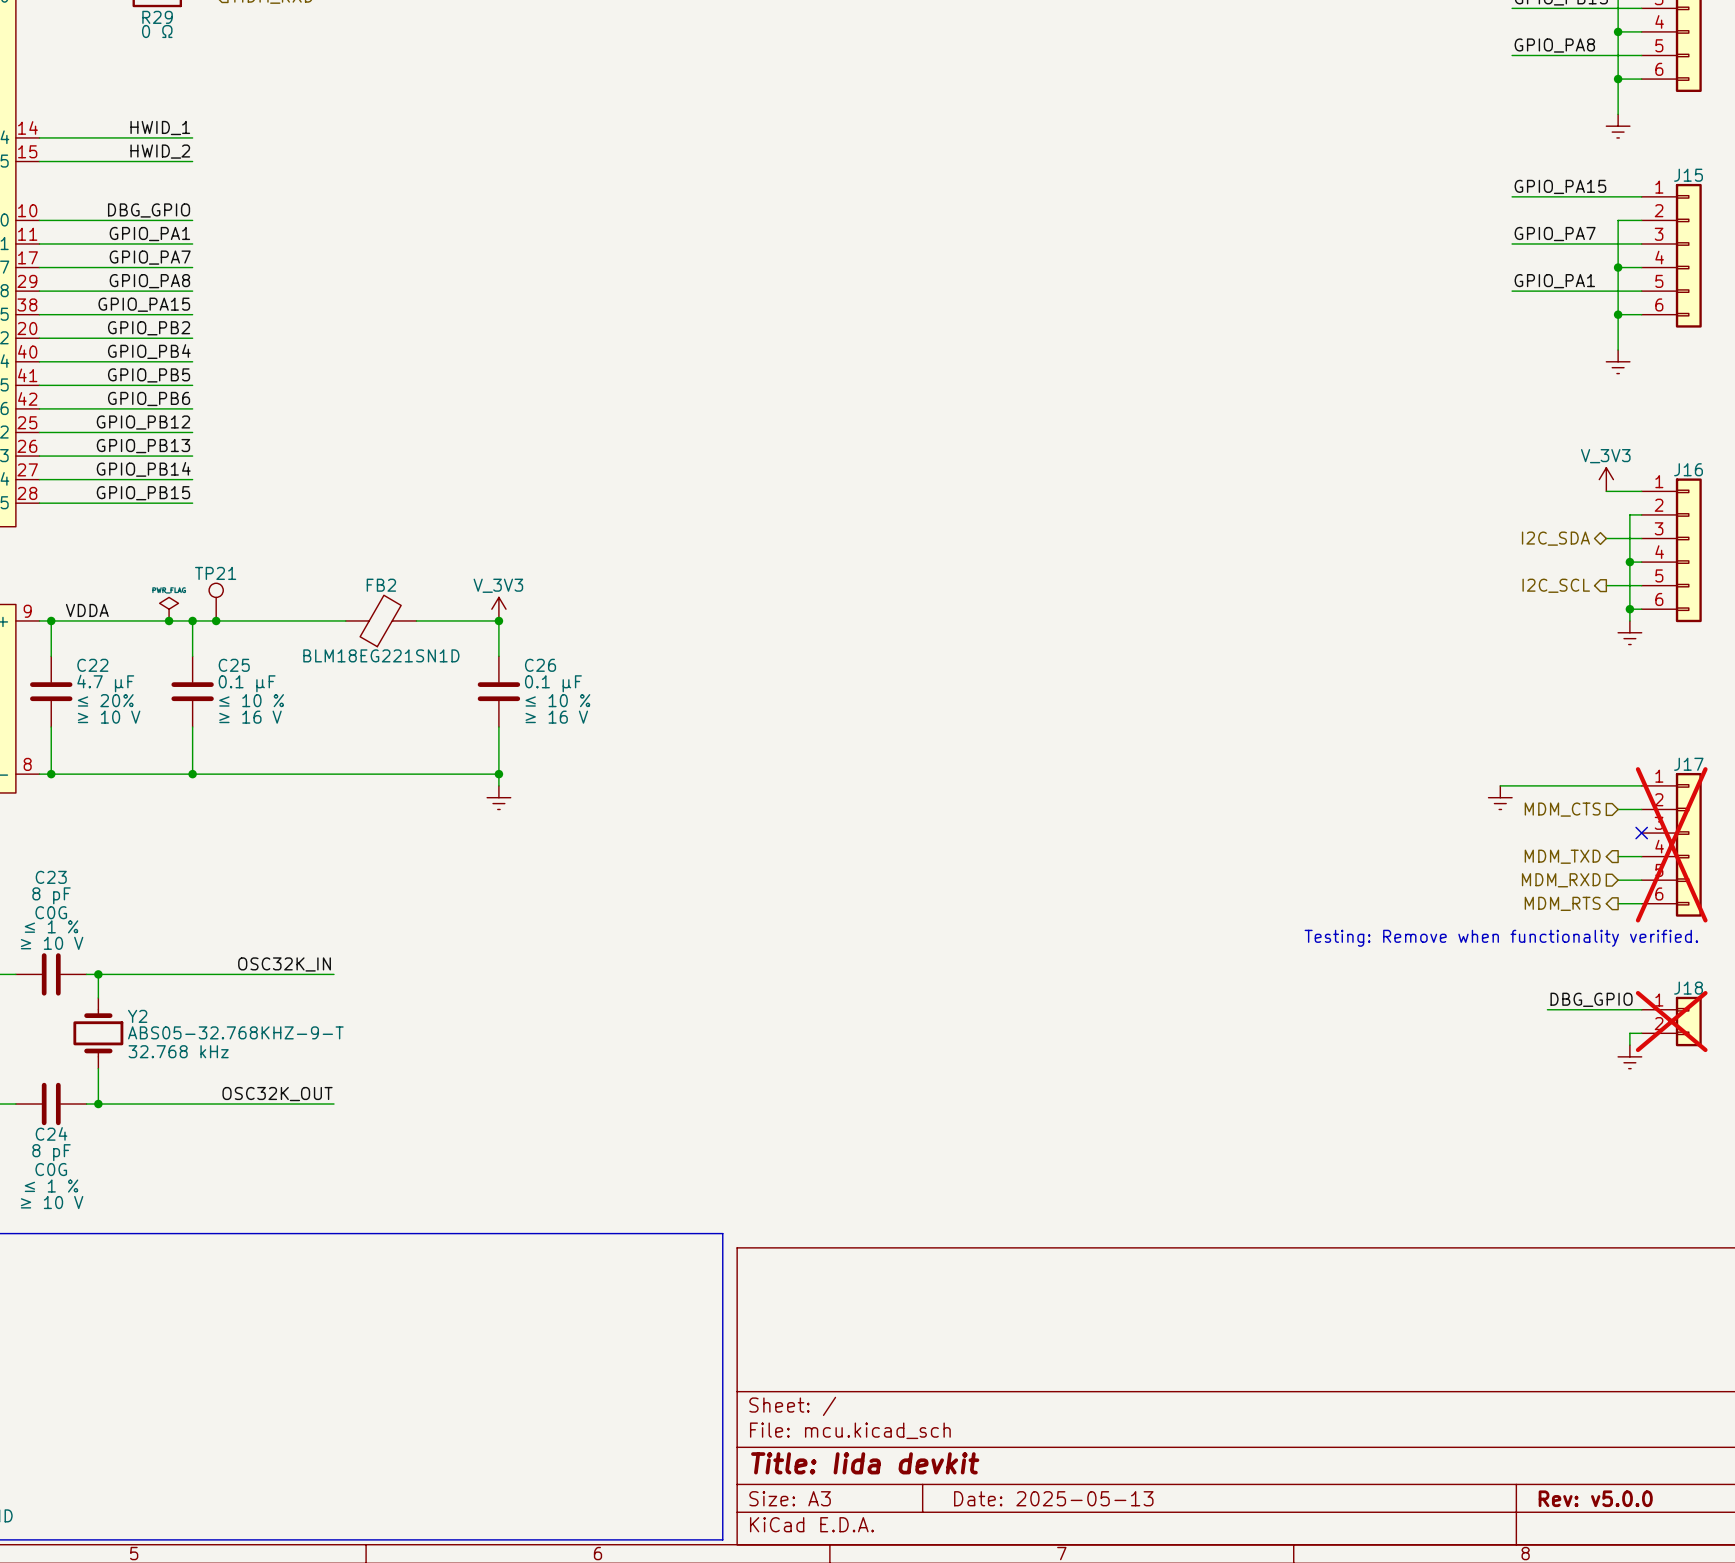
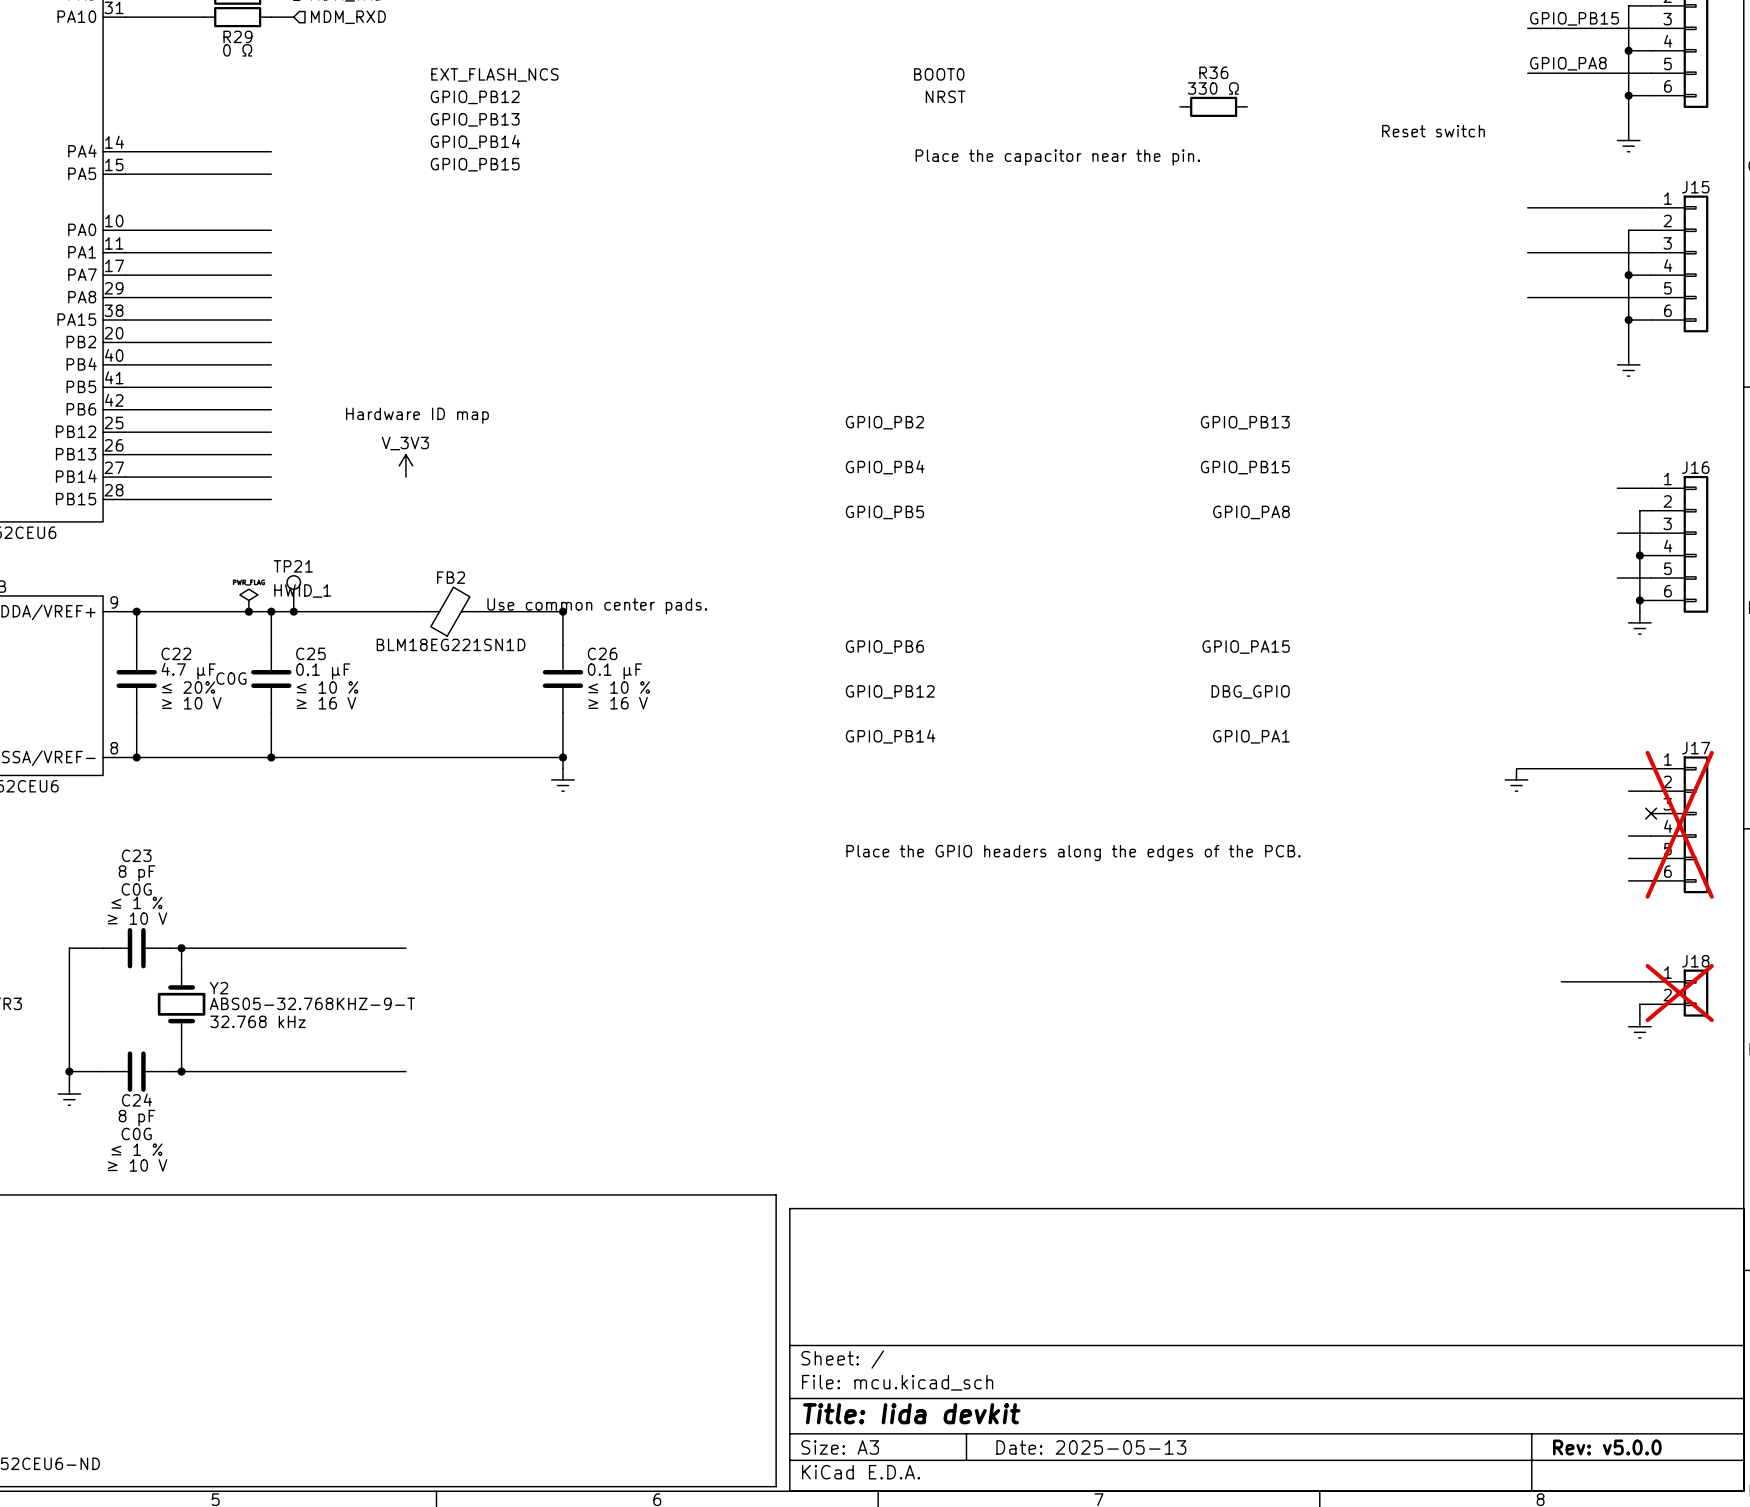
label: none -> BOOT0 (939, 74)
label: none -> EXT_FLASH_NCS (494, 74)
label: none -> GPIO_PB12 (475, 97)
label: none -> NRST (945, 96)
R36: none -> 330 Ω (1213, 106)
label: none -> GPIO_PB13 (475, 119)
text: none -> Reset switch (1433, 131)
label: none -> GPIO_PB14 (475, 142)
label: HWID_1 (160, 128) -> none
text: none -> Place the capacitor near the pin. (1057, 157)
label: HWID_2 (160, 151) -> none
label: none -> GPIO_PB15 (475, 164)
label: GPIO_PA15 (1560, 186) -> none
label: DBG_GPIO (149, 210) -> none
label: GPIO_PA1 (149, 234) -> none
label: GPIO_PA7 (1555, 234) -> none
label: GPIO_PA7 (150, 257) -> none
label: GPIO_PA8 (149, 281) -> none
label: GPIO_PA1 (1554, 281) -> none
label: GPIO_PA15 (144, 304) -> none
label: GPIO_PB2 (149, 328) -> none
label: GPIO_PB4 (149, 351) -> none
label: GPIO_PB5 (149, 375) -> none
label: GPIO_PB6 (149, 398) -> none
text: none -> Hardware ID map (417, 415)
label: GPIO_PB12 (143, 422) -> none
label: none -> GPIO_PB2 (884, 422)
label: none -> GPIO_PB13 (1245, 422)
label: GPIO_PB13 (143, 446) -> none
label: GPIO_PB14 (143, 469) -> none
label: none -> GPIO_PB4 (885, 467)
label: none -> GPIO_PB15 (1245, 467)
power symbol: V_3V3 (1606, 479) -> none
label: GPIO_PB15 (143, 493) -> none
label: none -> GPIO_PB5 (884, 512)
label: none -> GPIO_PA8 (1251, 512)
hierarchical label: I2C_SDA (1555, 538) -> none
hierarchical label: I2C_SCL (1556, 585) -> none
label: none -> HWID_1 (302, 590)
power symbol position: V_3V3 (498, 609) -> V_3V3 (405, 465)
label: VDDA (87, 610) -> none
text: none -> Use common center pads. (597, 606)
label: none -> GPIO_PB6 (884, 647)
label: none -> GPIO_PA15 (1246, 647)
C25 text: none -> C0G (231, 678)
label: none -> GPIO_PB12 (890, 691)
label: none -> DBG_GPIO (1250, 691)
label: none -> GPIO_PB14 (890, 736)
label: none -> GPIO_PA1 (1251, 736)
hierarchical label: MDM_CTS (1562, 809) -> none
hierarchical label: MDM_TXD (1562, 856) -> none
text: none -> Place the GPIO headers along the edges of the PCB. (1073, 853)
hierarchical label: MDM_RXD (1561, 880) -> none
hierarchical label: MDM_RTS (1562, 903) -> none
text: Testing: Remove when functionality verified. (1501, 938) -> none
label: OSC32K_IN (284, 964) -> none
label: DBG_GPIO (1591, 999) -> none
label: OSC32K_OUT (277, 1094) -> none

